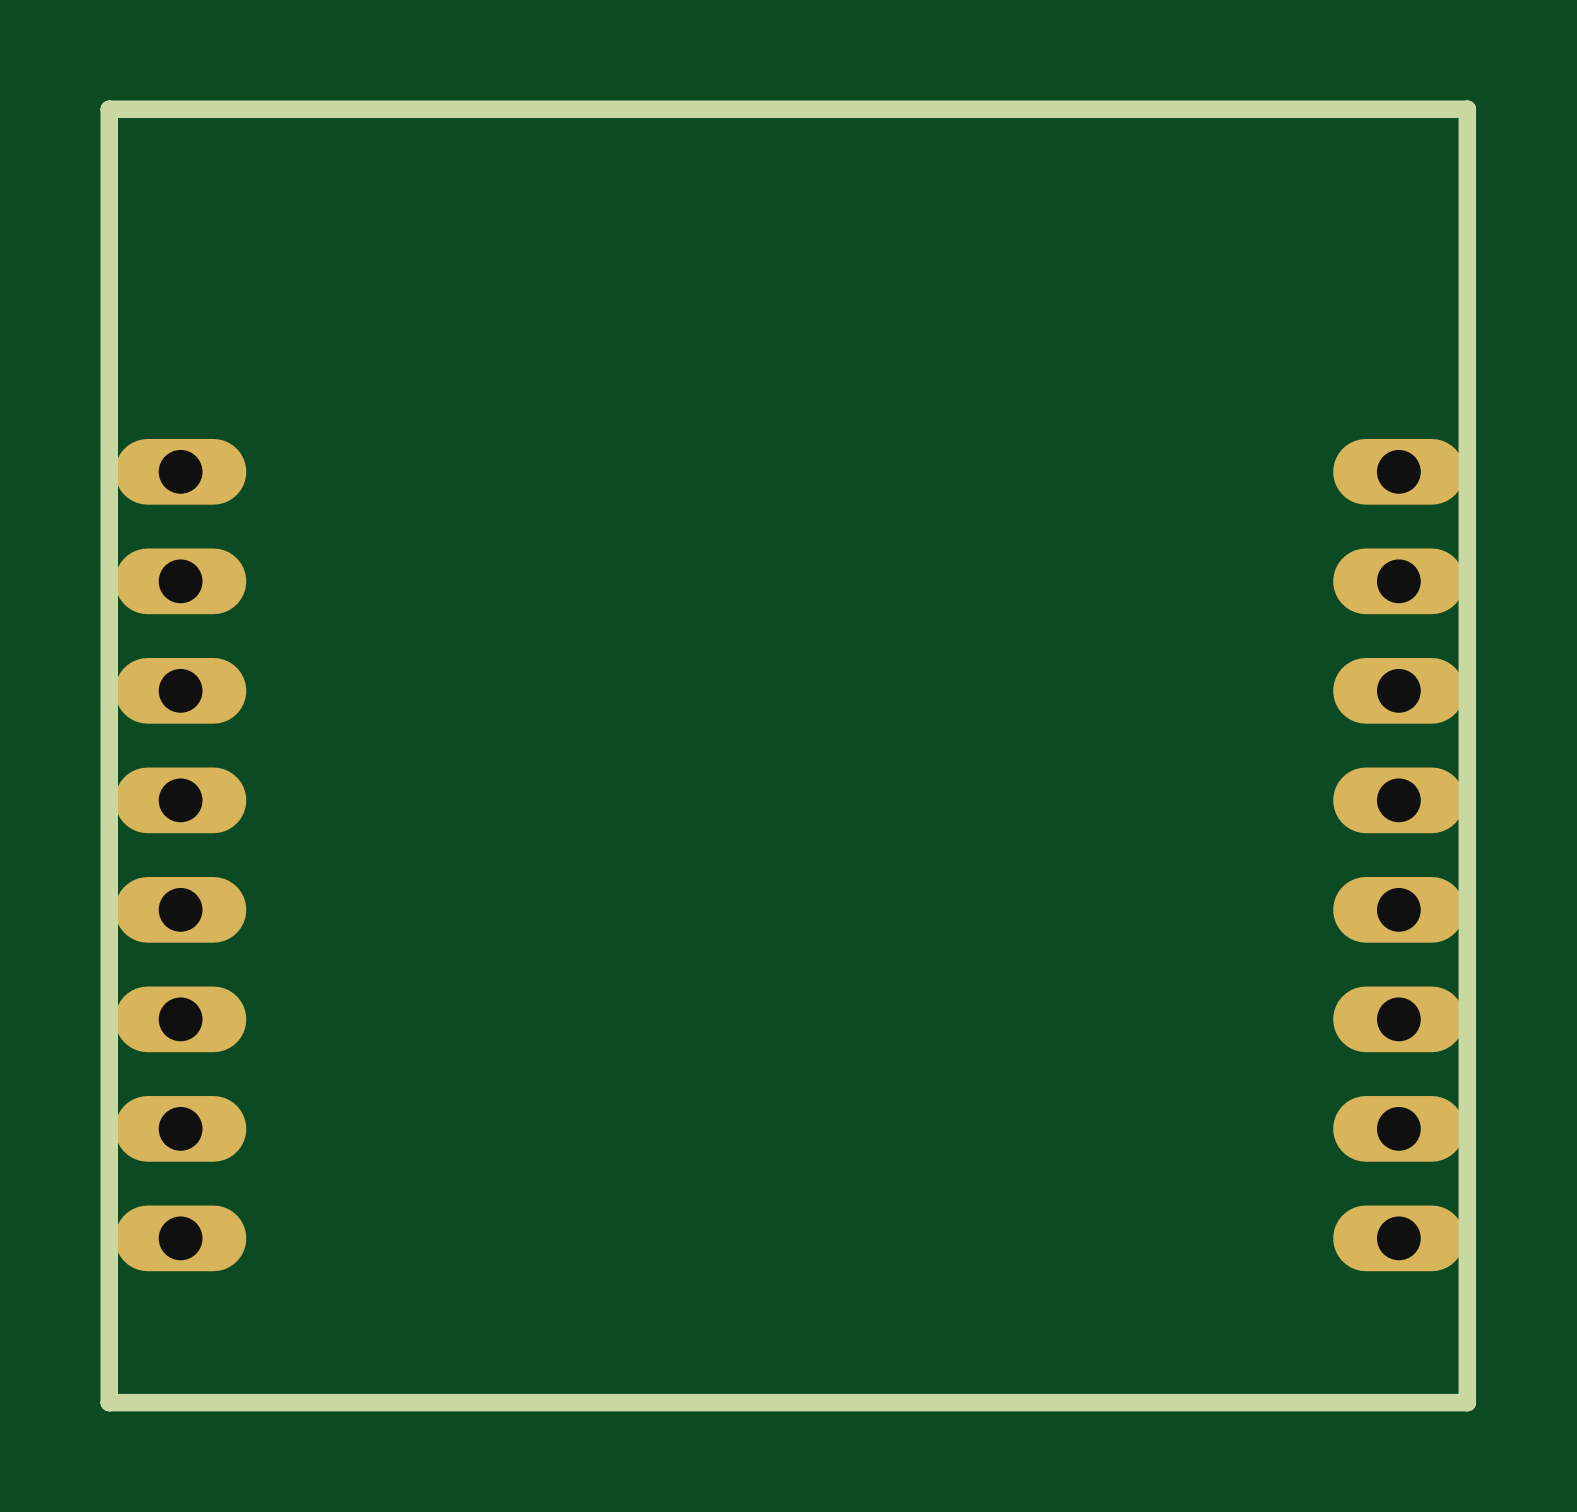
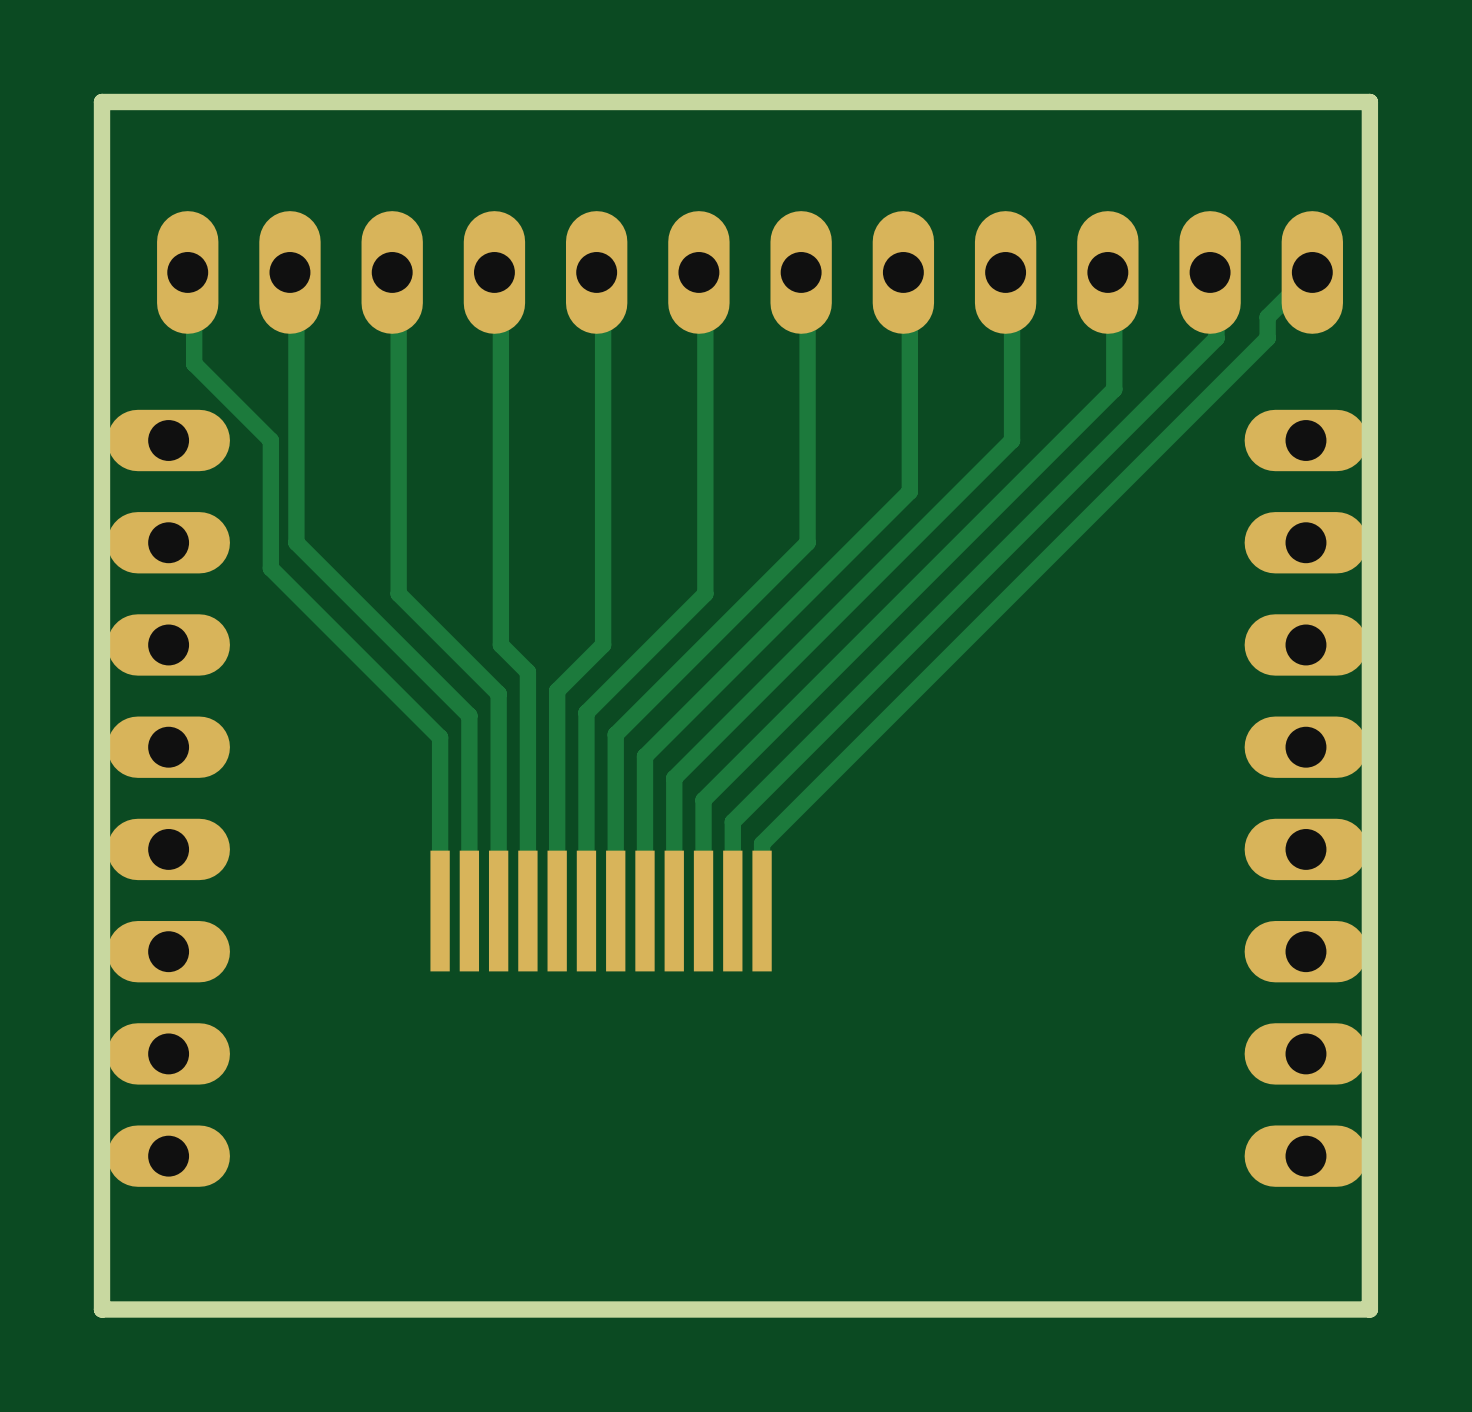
track: none -> (187, 272) (194, 278) (194, 363) (270, 440) (270, 568) (440, 737) (440, 911)
track: none -> (289, 272) (296, 278) (296, 542) (469, 715) (469, 911)
track: none -> (392, 272) (398, 278) (398, 593) (498, 693) (498, 911)
track: none -> (494, 272) (500, 278) (500, 644) (527, 672) (527, 911)
track: none -> (596, 272) (603, 278) (603, 644) (557, 690) (557, 911)
track: none -> (698, 272) (705, 278) (705, 593) (586, 712) (586, 911)
part: none -> (750, 272)
track: none -> (801, 272) (807, 278) (807, 542) (615, 734) (615, 911)
track: none -> (903, 272) (909, 278) (909, 491) (644, 756) (644, 911)
track: none -> (1005, 272) (1012, 278) (1012, 440) (674, 778) (674, 911)
track: none -> (1107, 272) (1114, 278) (1114, 389) (703, 800) (703, 911)
track: none -> (1210, 272) (1216, 278) (1216, 338) (732, 821) (732, 911)
track: none -> (1312, 272) (1267, 317) (1267, 338) (762, 843) (762, 911)
part: none -> (601, 911)

